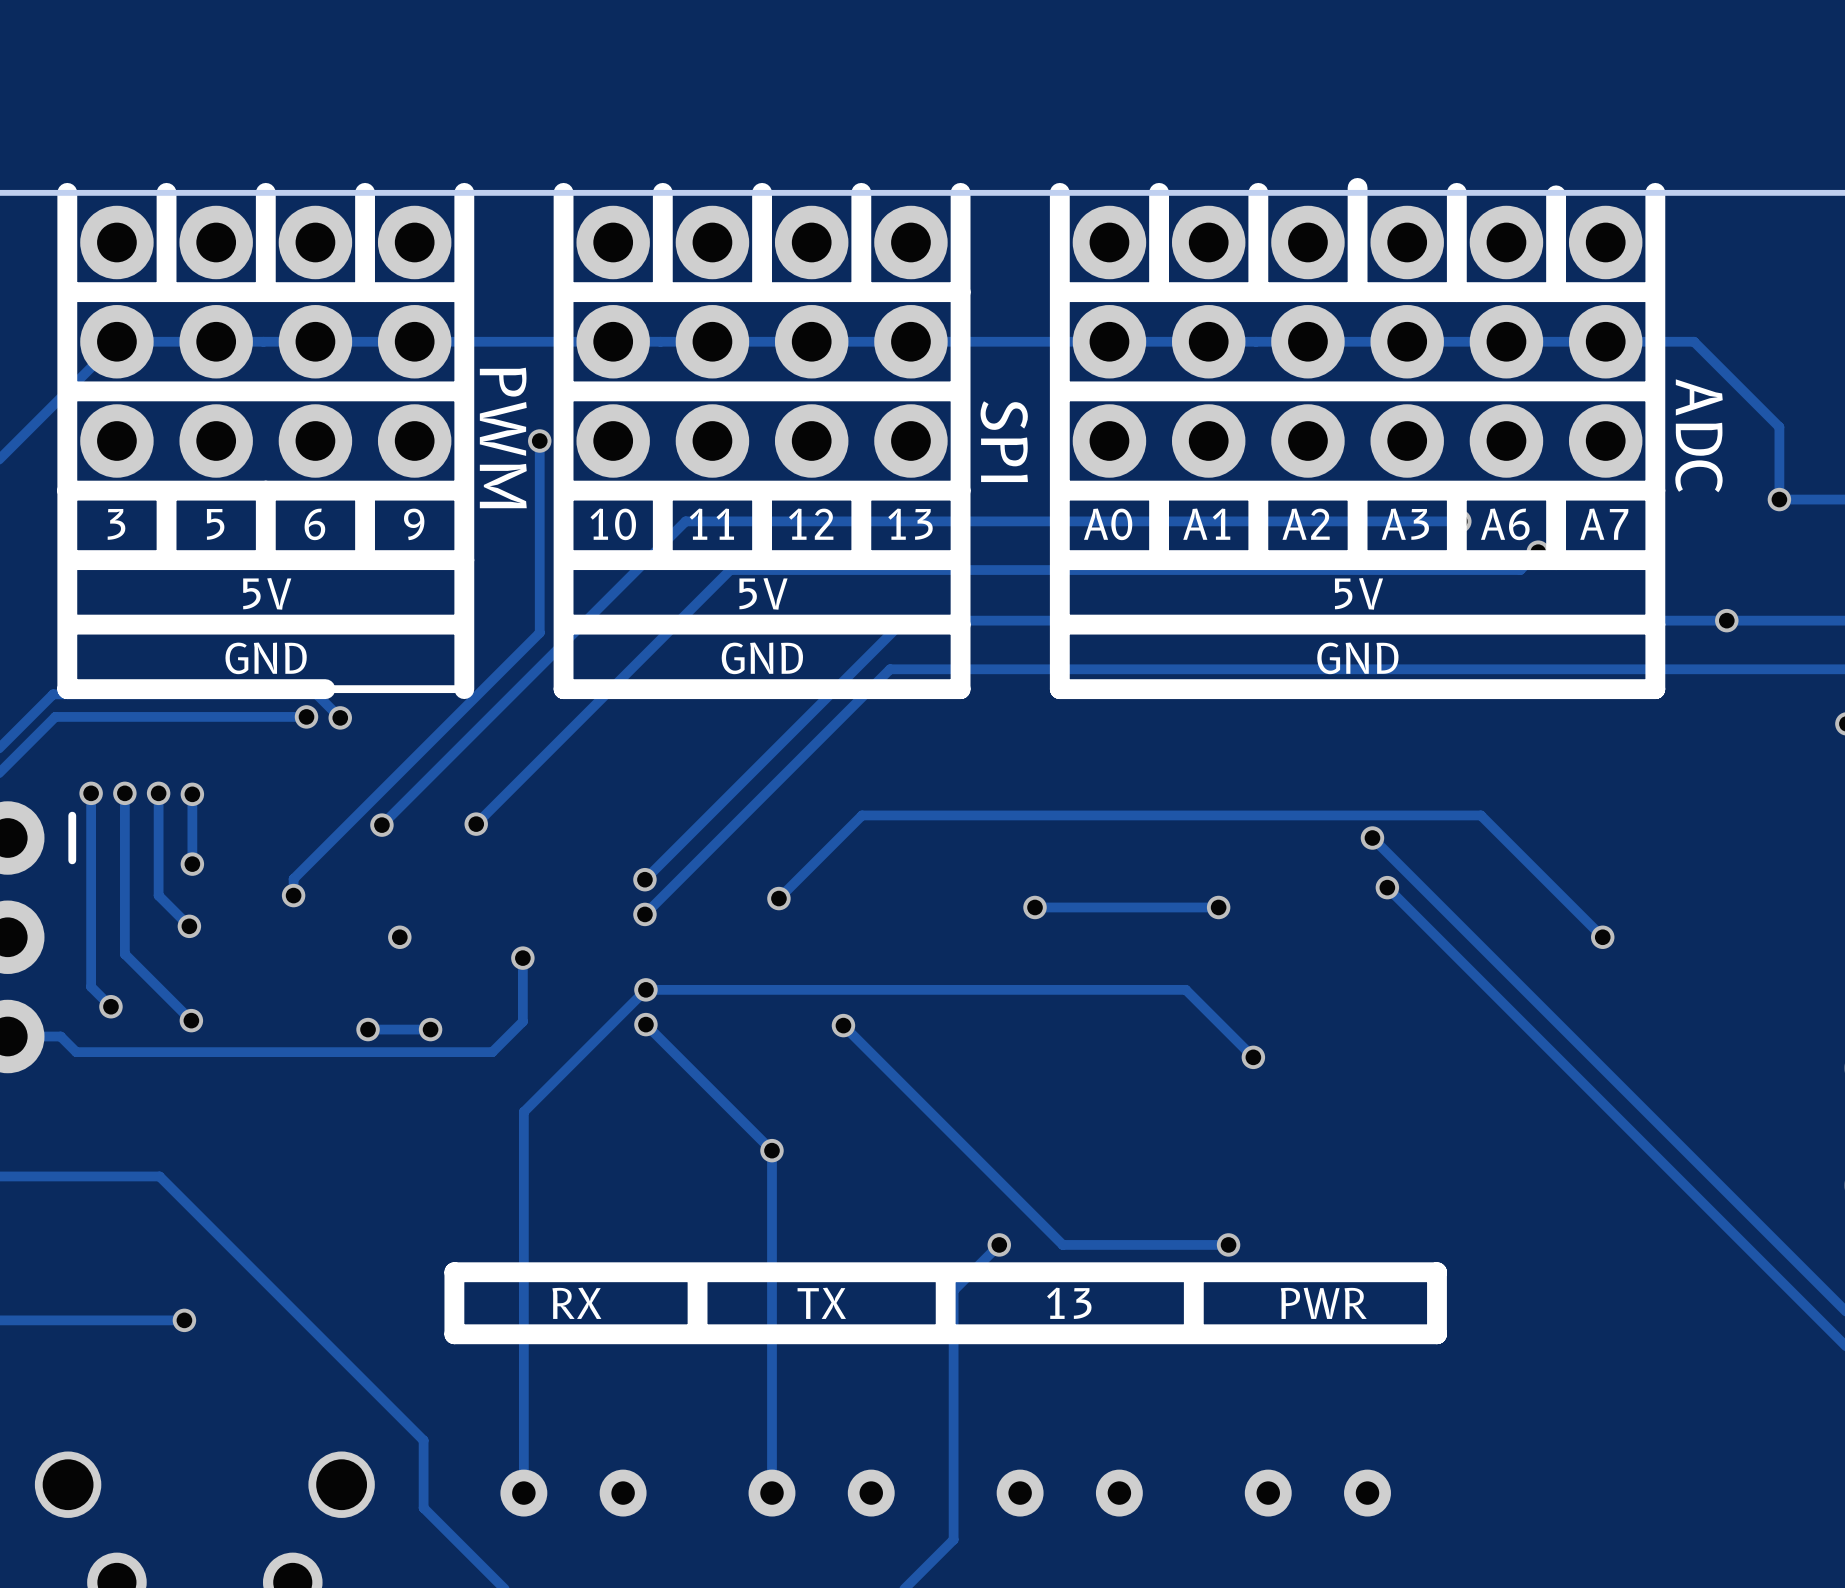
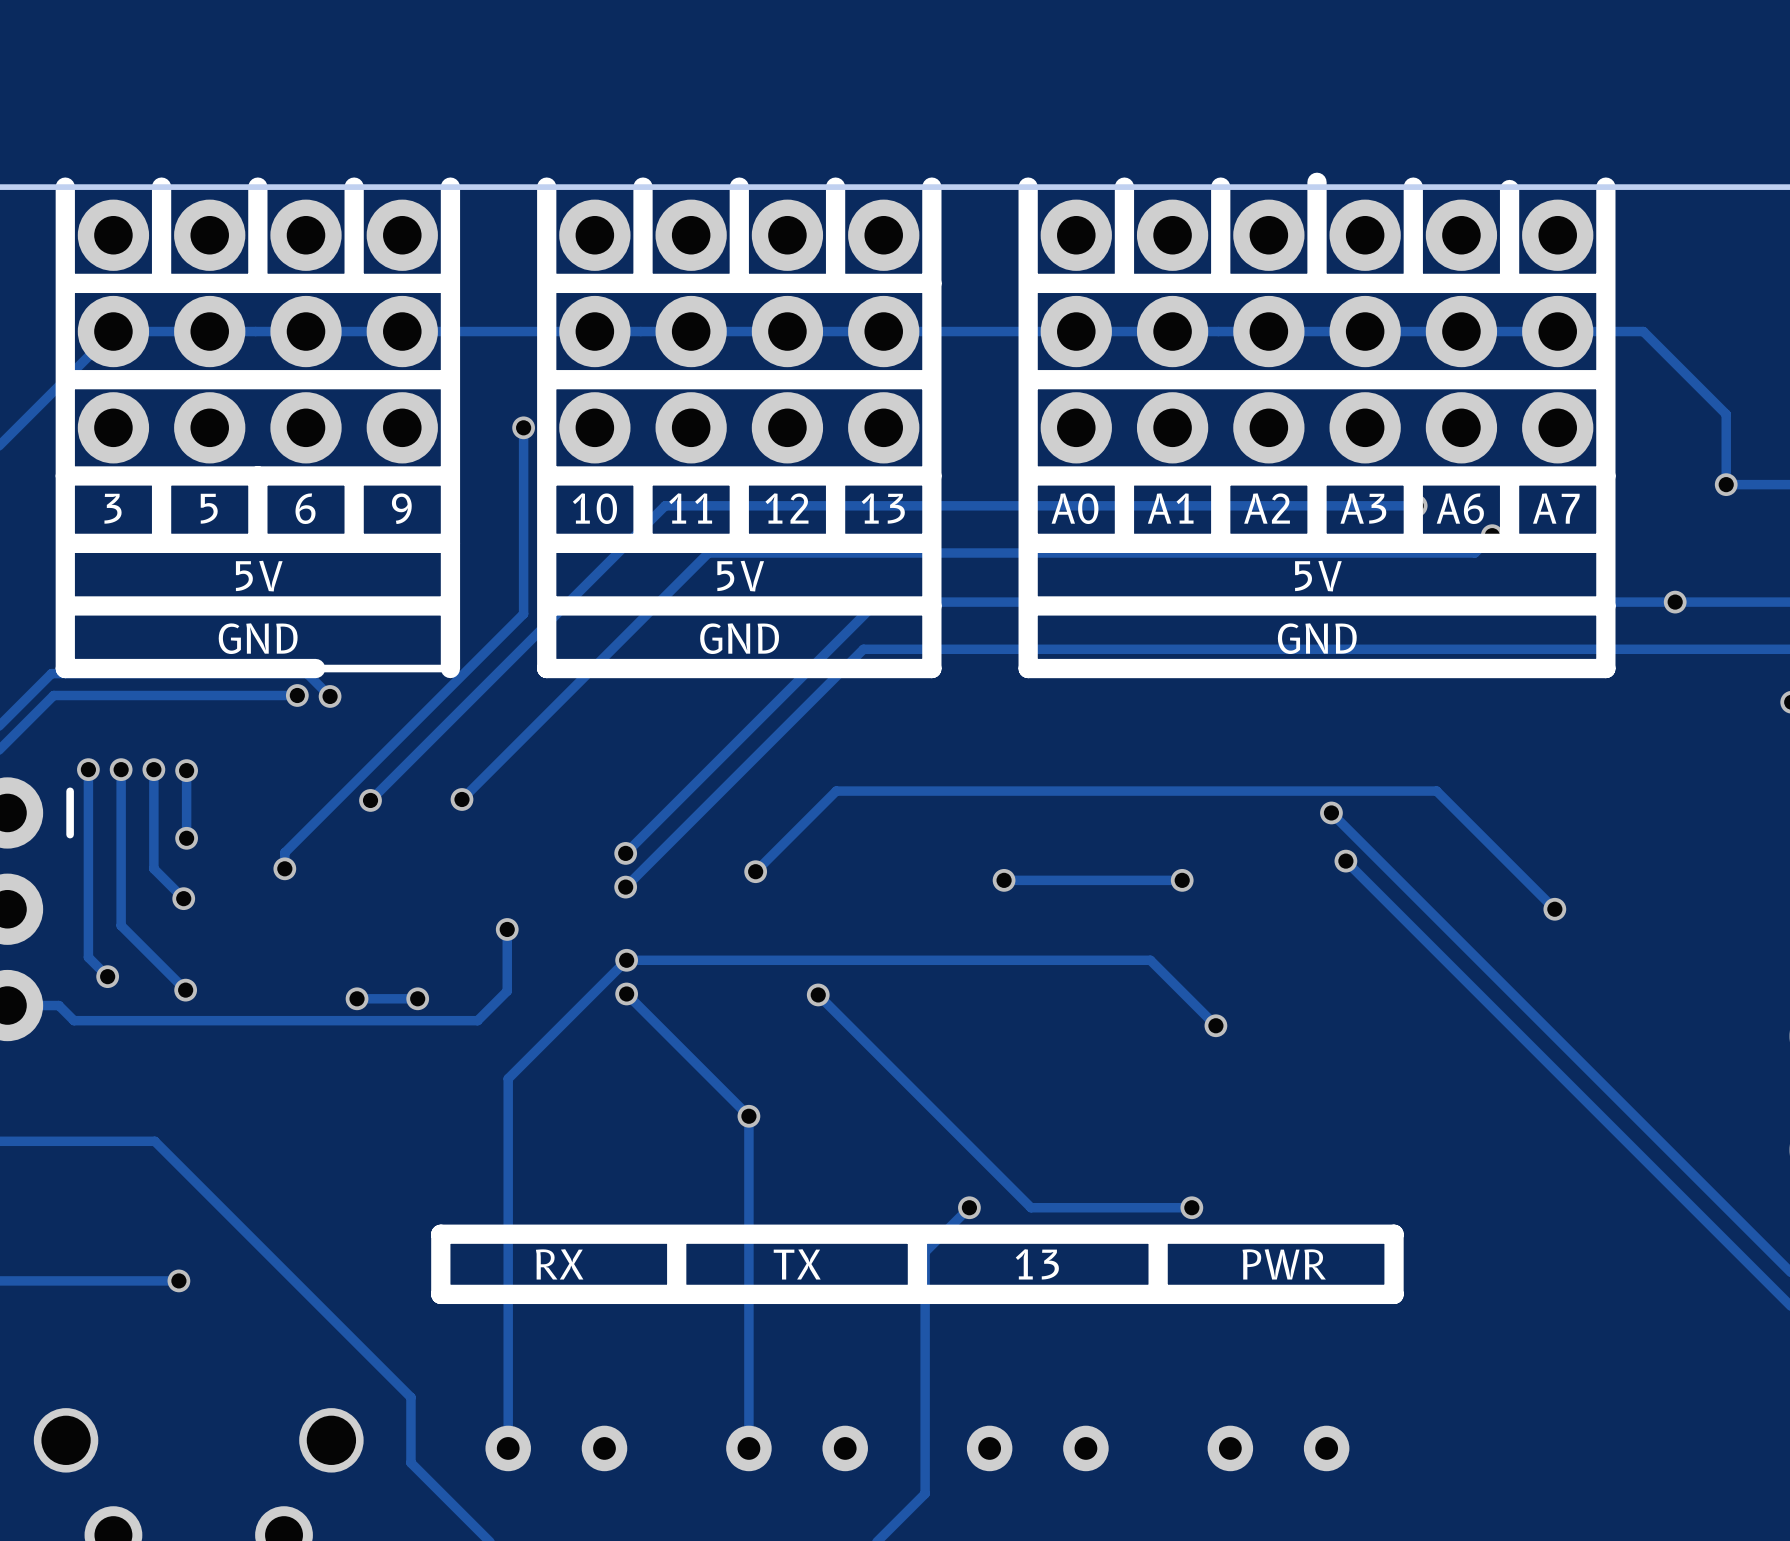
text: ADC (1699, 435) -> none
text: PWM (503, 437) -> none
text: SPI (1004, 441) -> none
via: (399, 937) -> none

